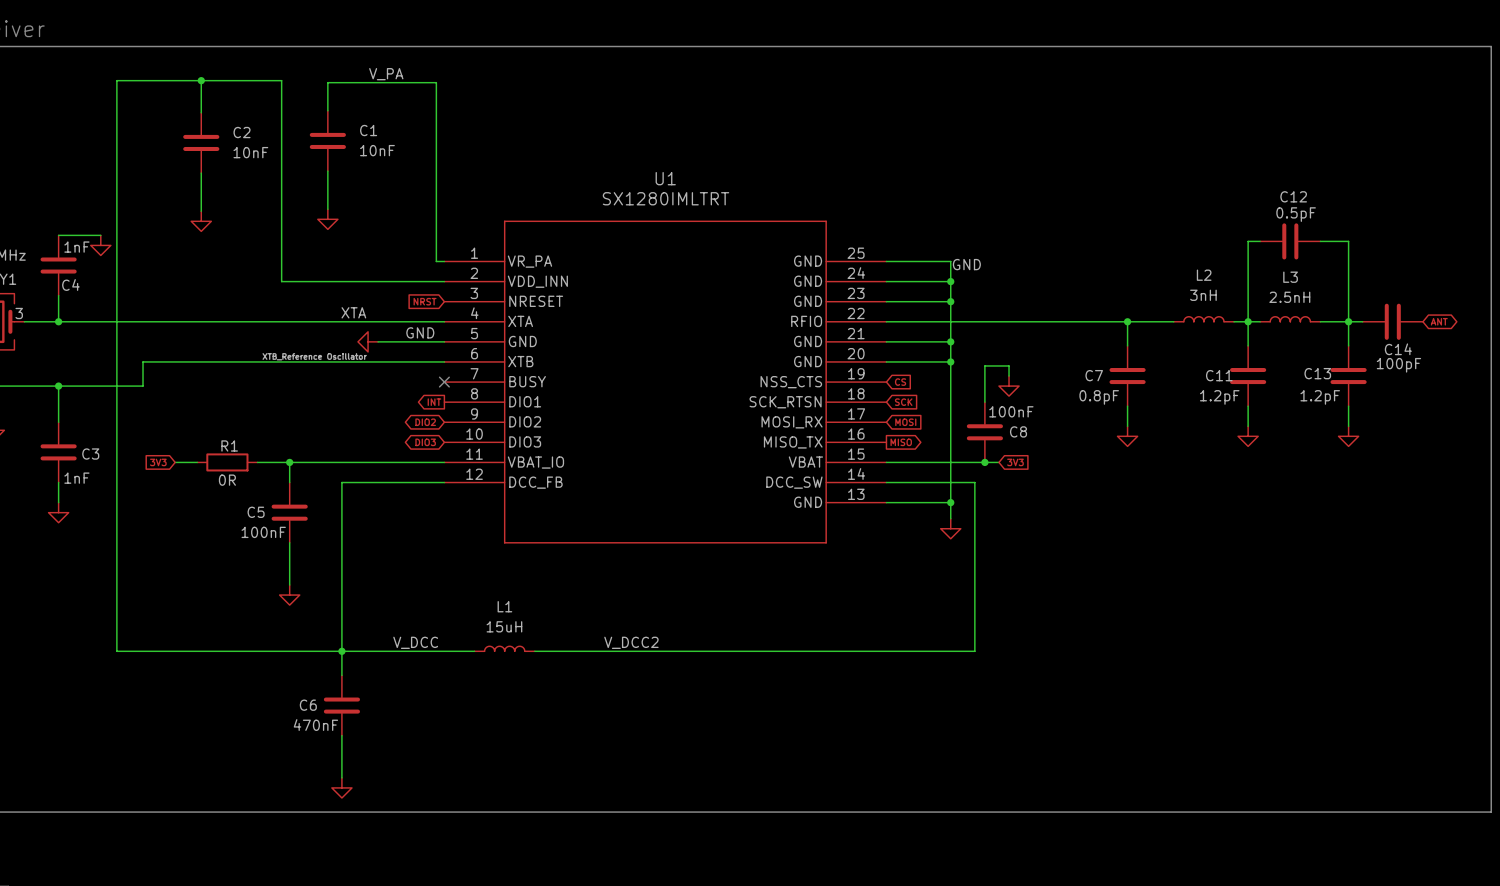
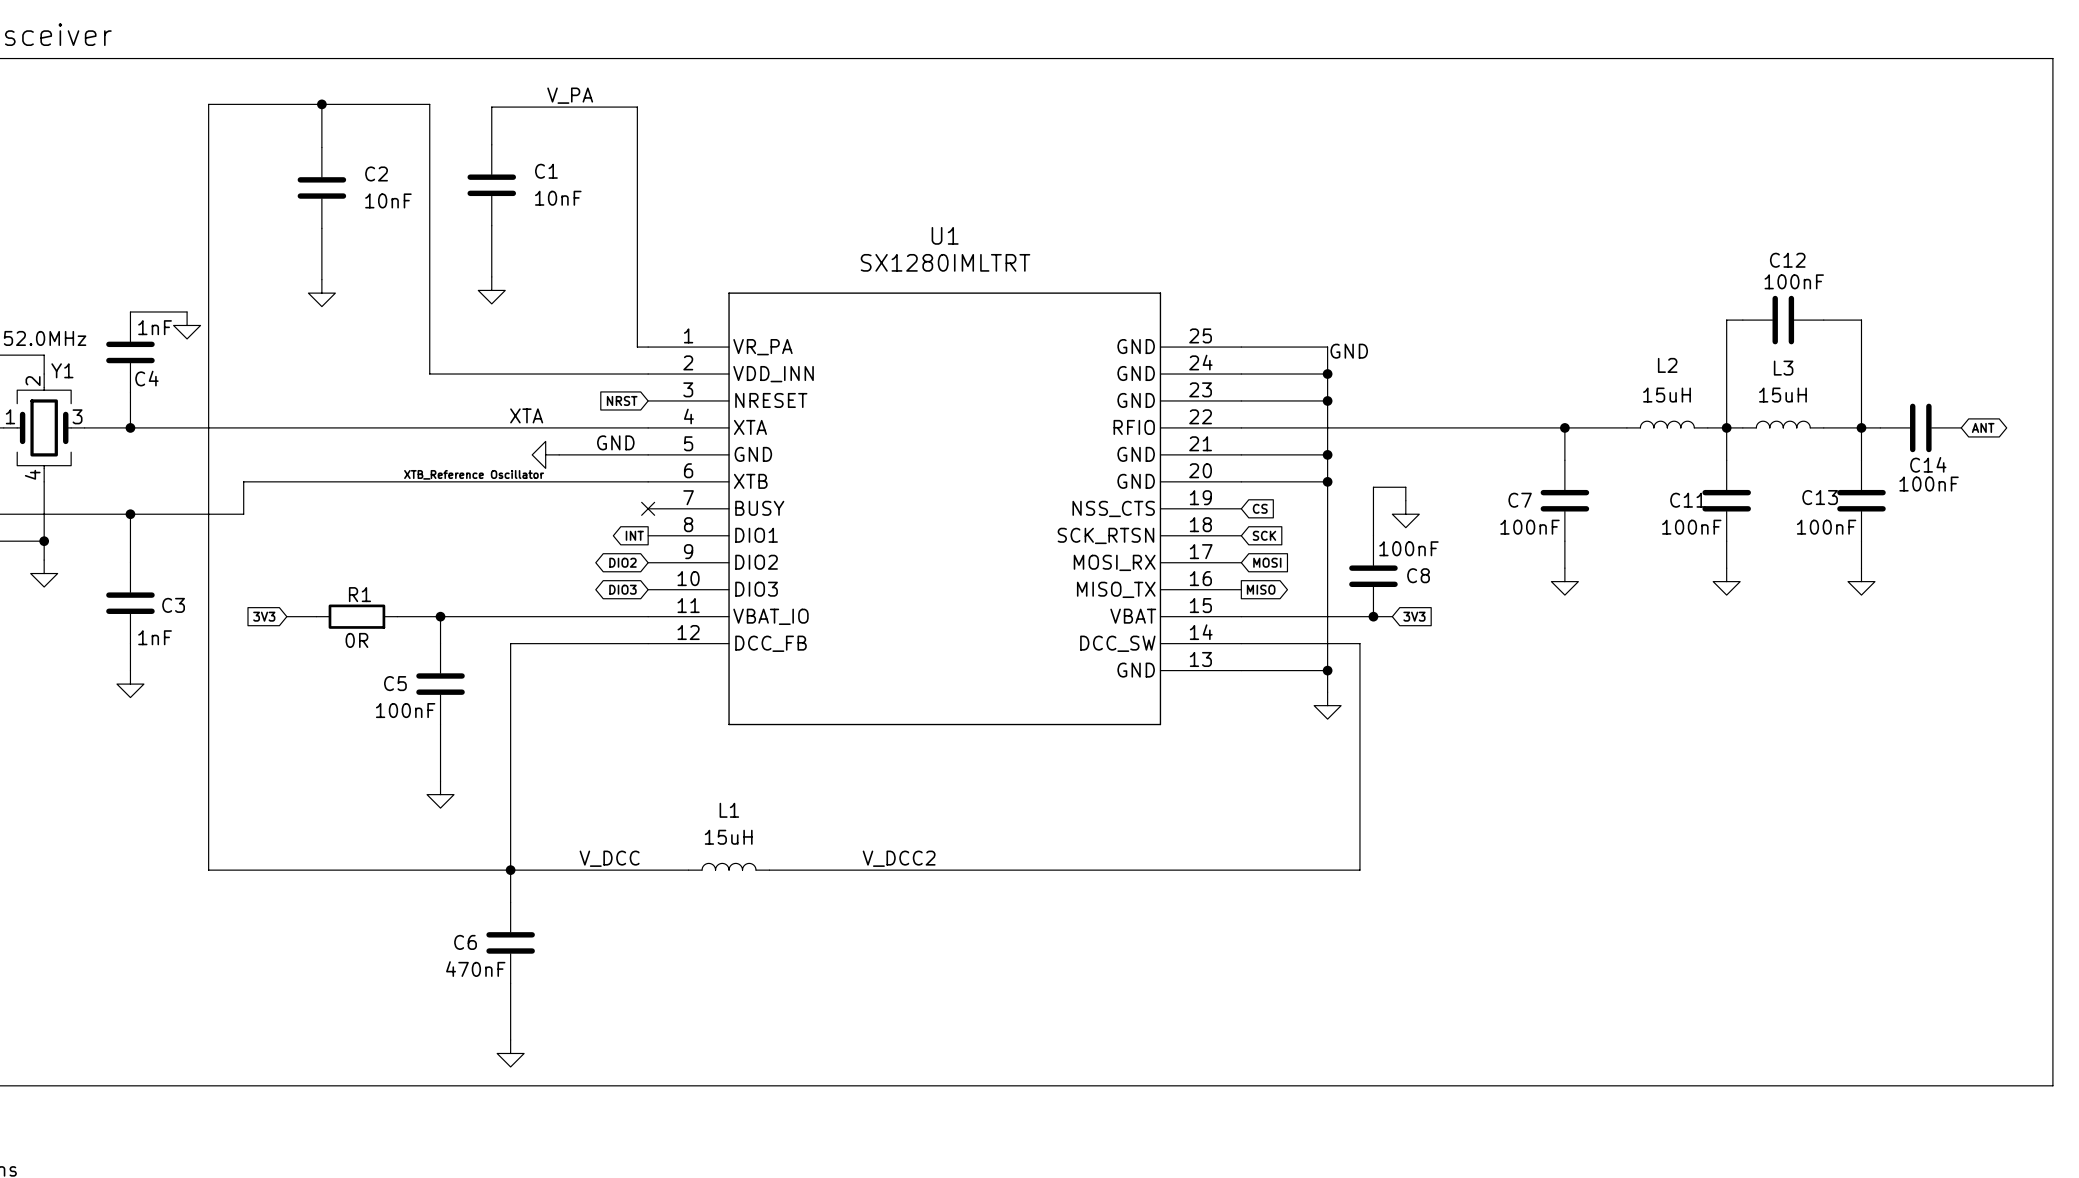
C12 value: 0.5pF (1296, 214) -> 100nF (1794, 281)
L2 value: 3nH (1203, 295) -> 15uH (1667, 395)
L3 value: 2.5nH (1289, 297) -> 15uH (1782, 395)
C14 value: 100pF (1398, 365) -> 100nF (1929, 484)
C7 value: 0.8pF (1099, 397) -> 100nF (1530, 527)
C11 value: 1.2pF (1219, 397) -> 100nF (1691, 527)
C13 value: 1.2pF (1320, 397) -> 100nF (1826, 527)

